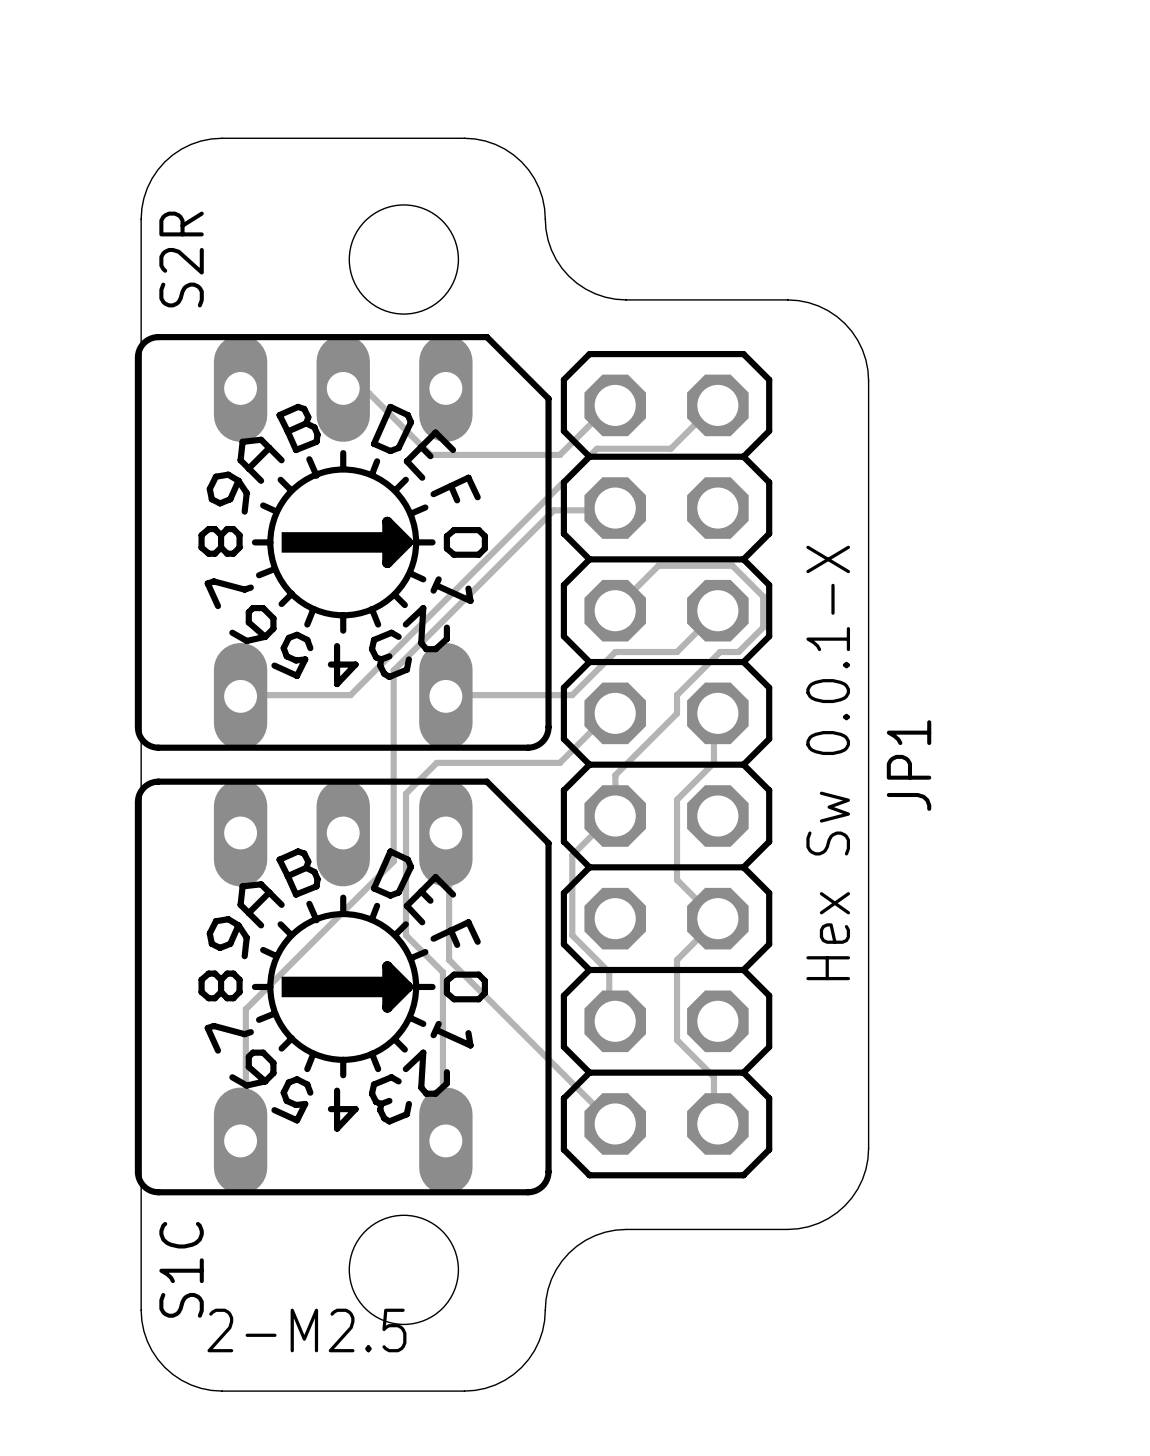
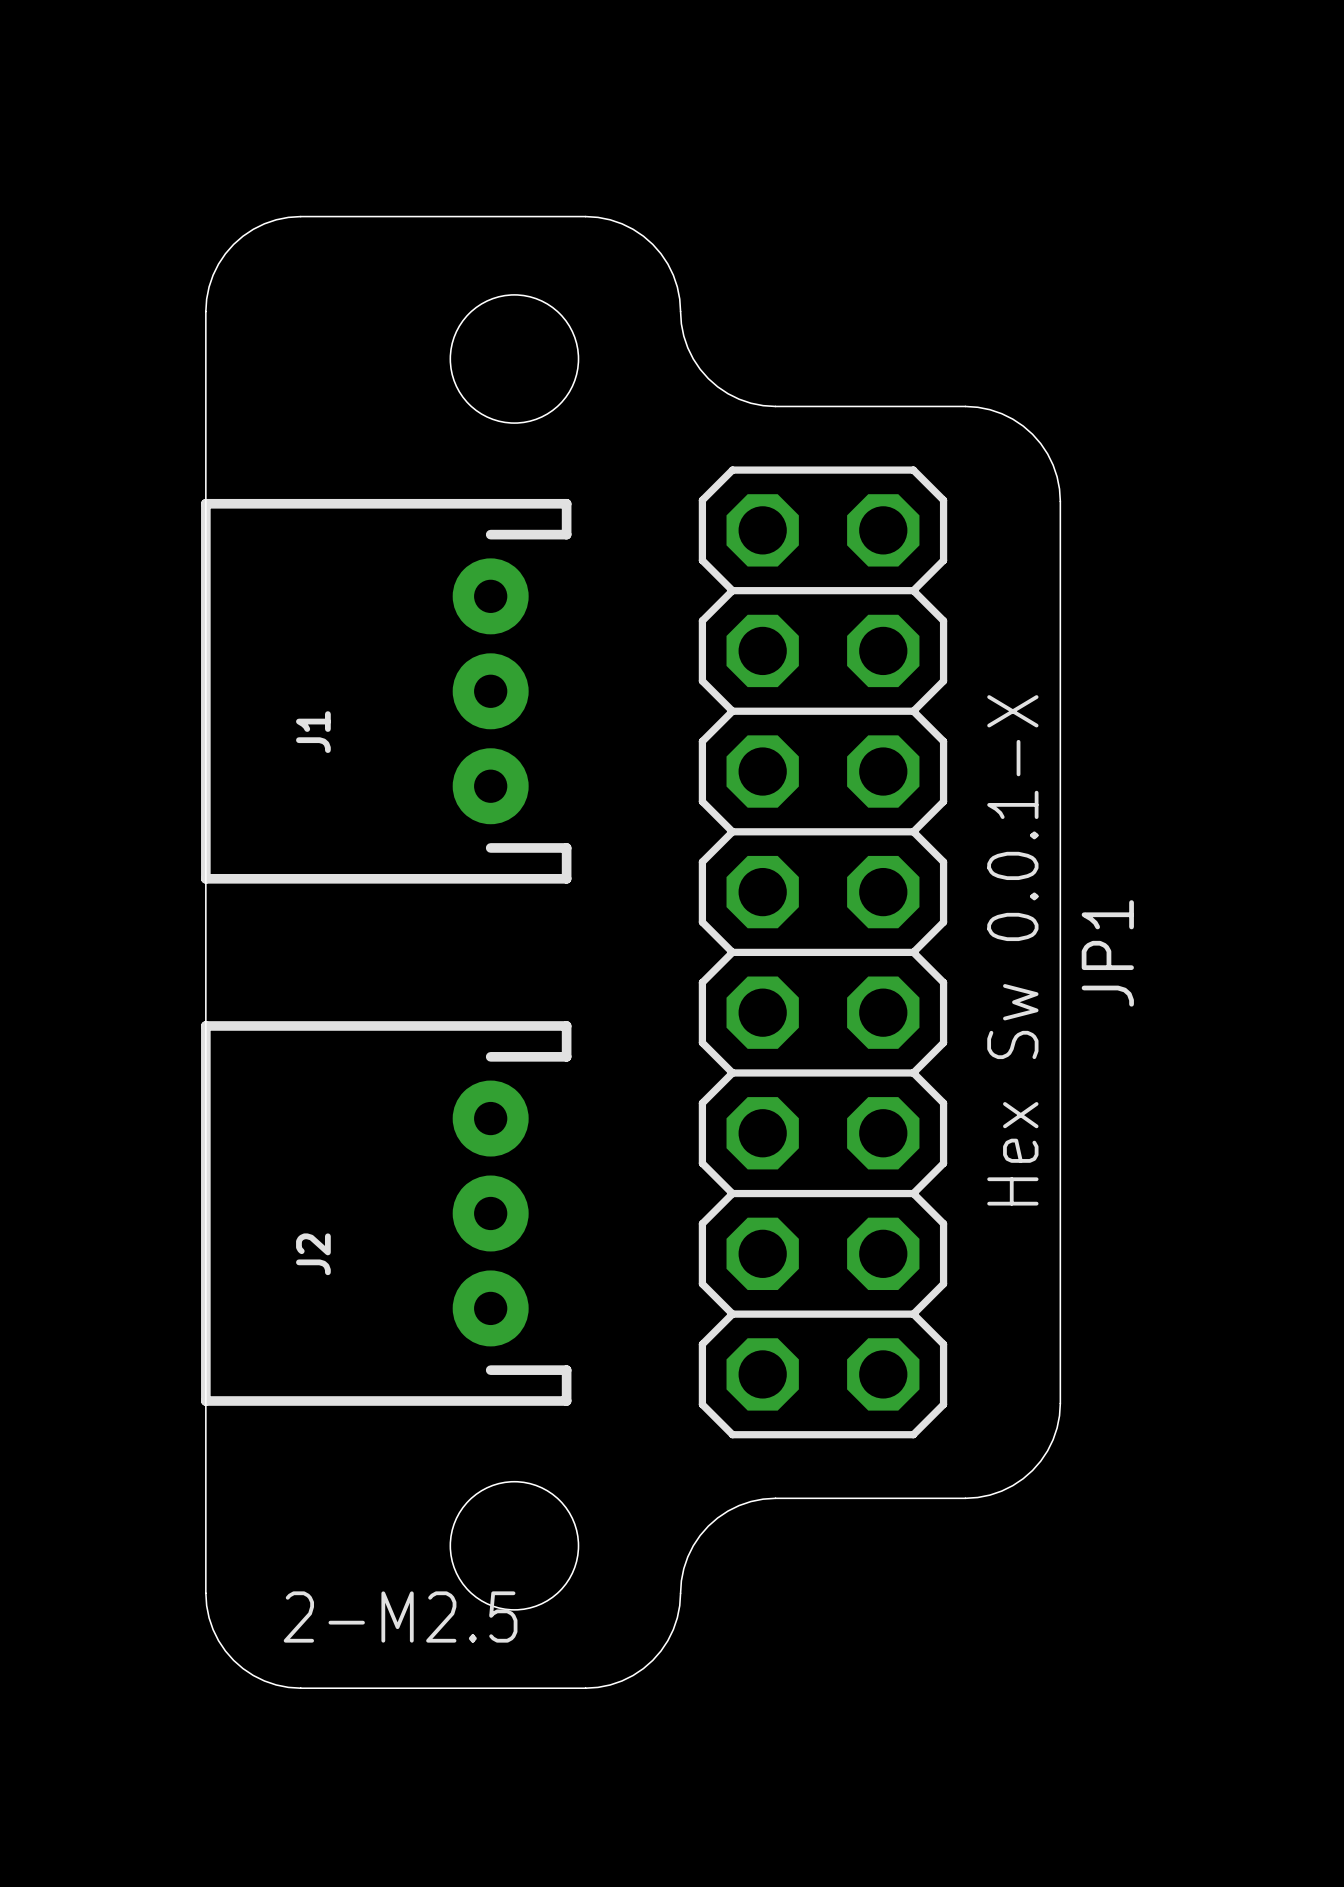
track: (343, 388) (344, 393) (369, 393) (430, 454) (559, 454) (609, 405) (615, 405) -> none
track: (717, 405) (713, 405) (670, 448) (596, 448) (350, 695) (240, 696) -> none
track: (615, 508) (609, 510) (553, 510) (393, 670) (393, 861) (245, 1009) (245, 1138) (240, 1140) -> none
J1: none -> (386, 691)
S2R: (343, 542) -> none
track: (615, 610) (658, 565) (732, 565) (763, 596) (763, 627) (738, 652) (720, 652) (677, 695) (677, 713) (615, 775) (615, 816) (609, 818) (572, 855) (572, 935) (609, 972) (609, 1015) (615, 1021) -> none
track: (717, 610) (677, 652) (615, 652) (572, 695) (445, 696) -> none
track: (615, 713) (609, 713) (559, 762) (436, 762) (406, 793) (406, 935) (442, 972) (442, 1138) (445, 1140) -> none
track: (717, 713) (713, 713) (713, 762) (677, 799) (677, 879) (717, 918) (677, 959) (677, 1040) (713, 1076) (713, 1120) (717, 1123) -> none
track: (445, 832) (449, 836) (449, 959) (615, 1123) -> none
J2: none -> (386, 1213)
S1C: (343, 986) -> none

